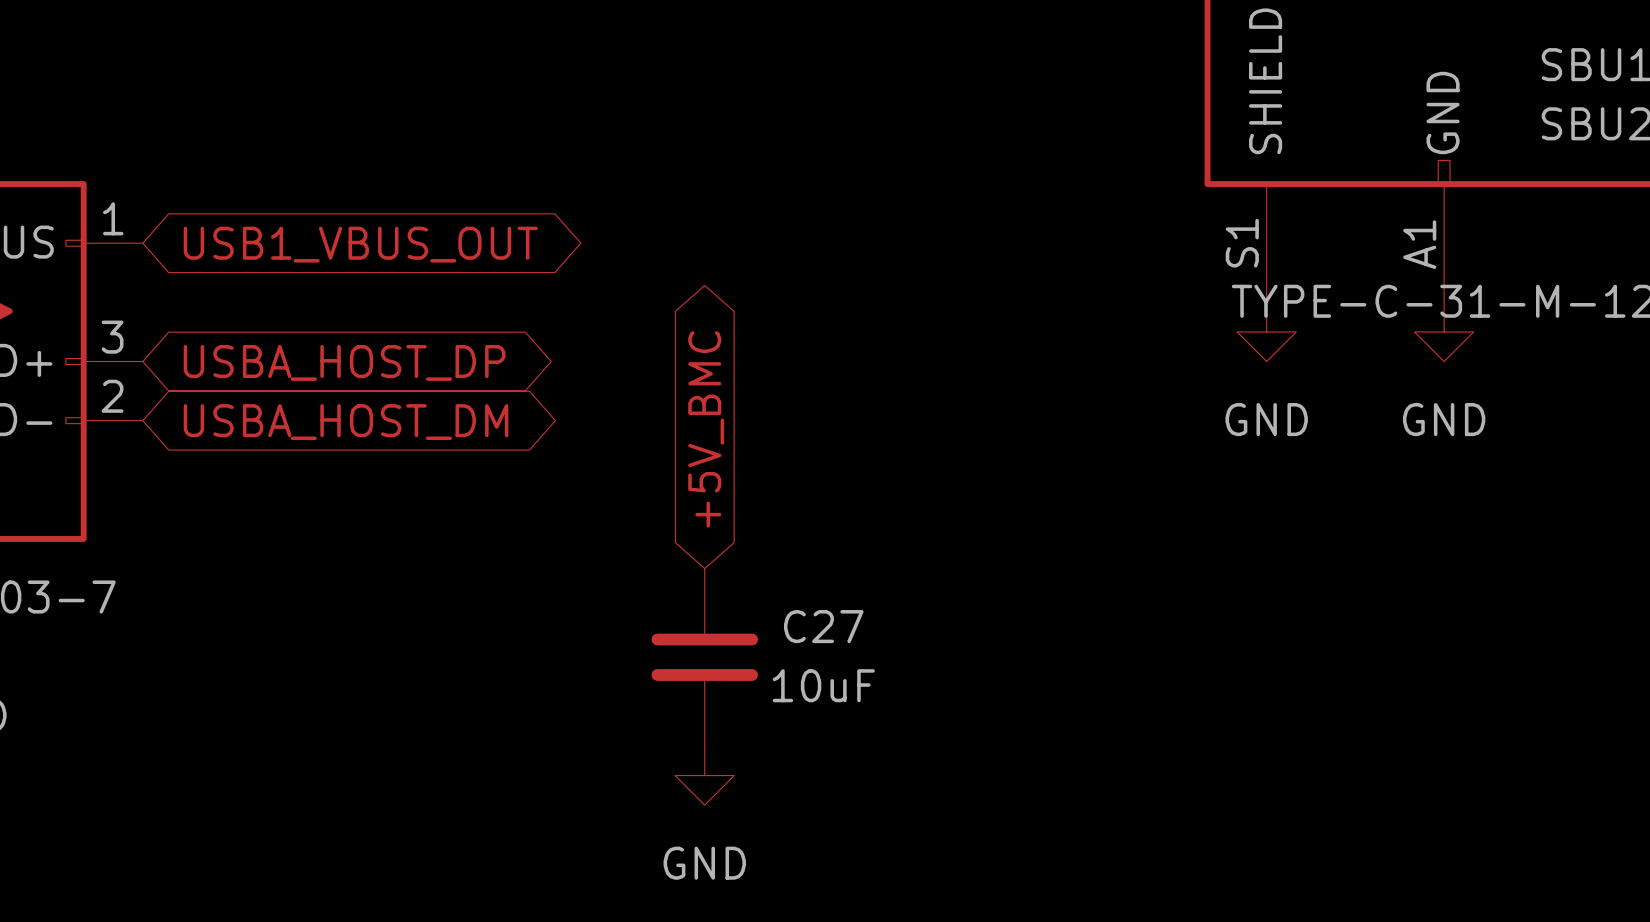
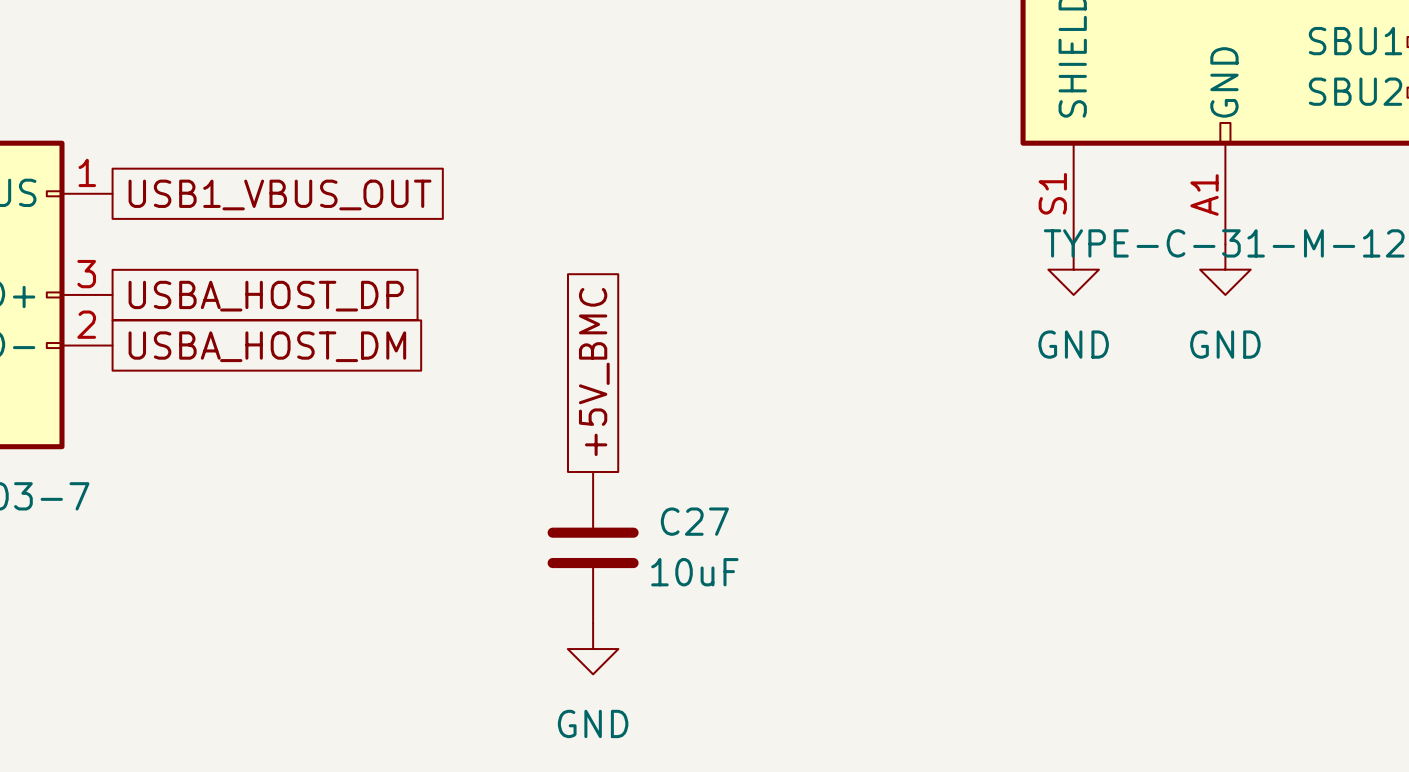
global label shape: bidirectional (360, 244) -> passive (280, 194)
global label shape: bidirectional (344, 362) -> passive (266, 296)
global label shape: bidirectional (346, 422) -> passive (267, 346)
global label shape: bidirectional (706, 429) -> passive (594, 371)

